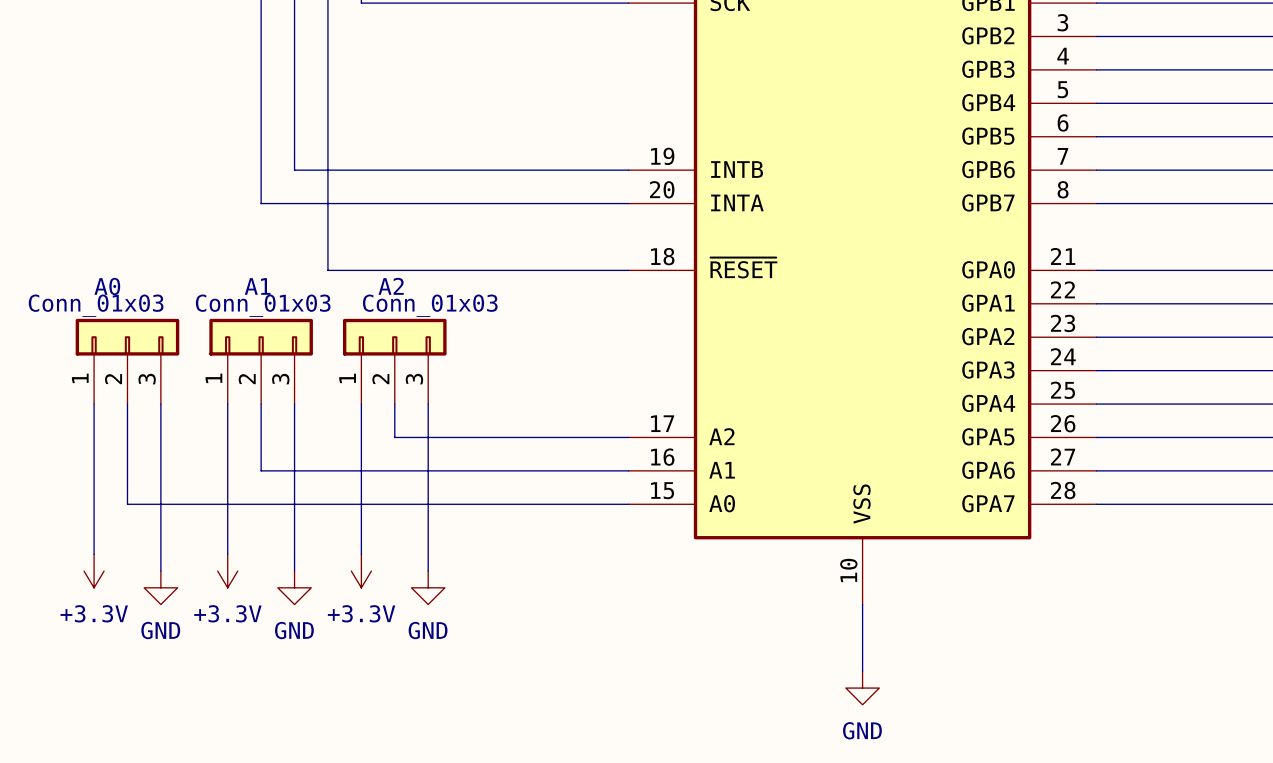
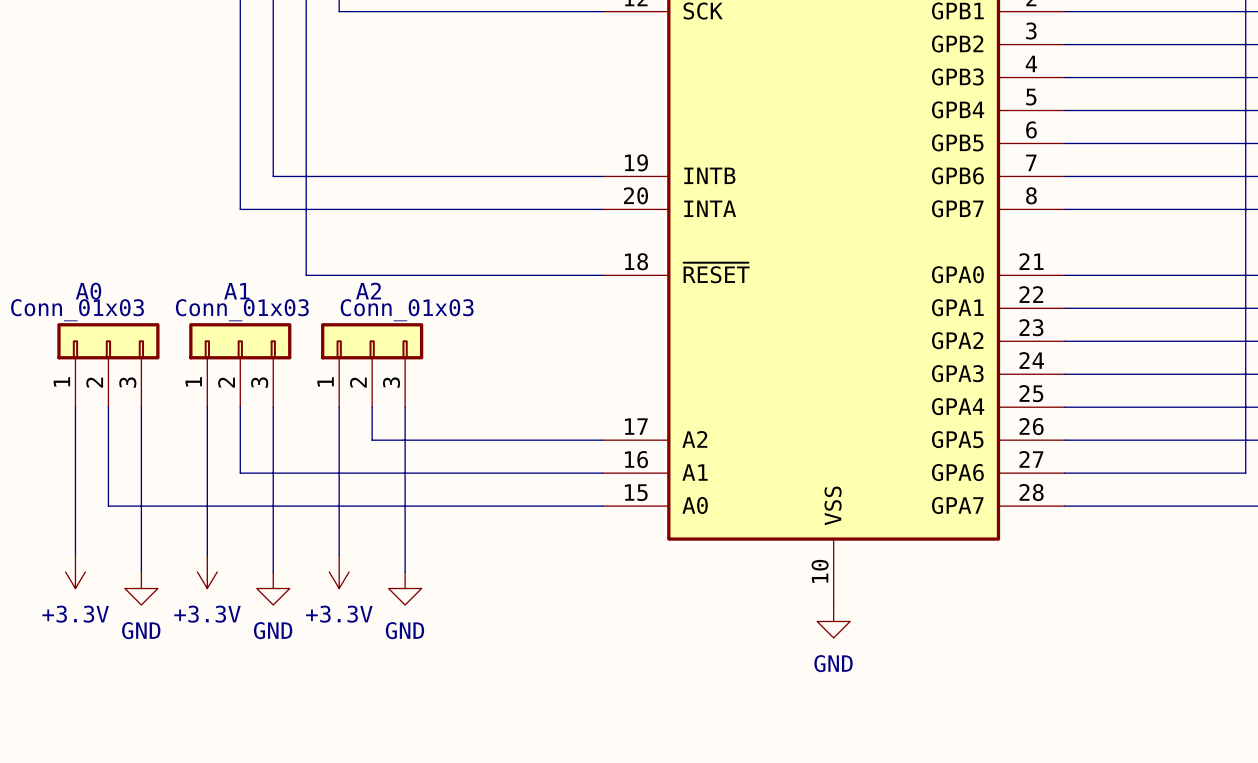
wire: (862, 604) (862, 671) -> none
power symbol position: GND (862, 688) -> GND (833, 621)

